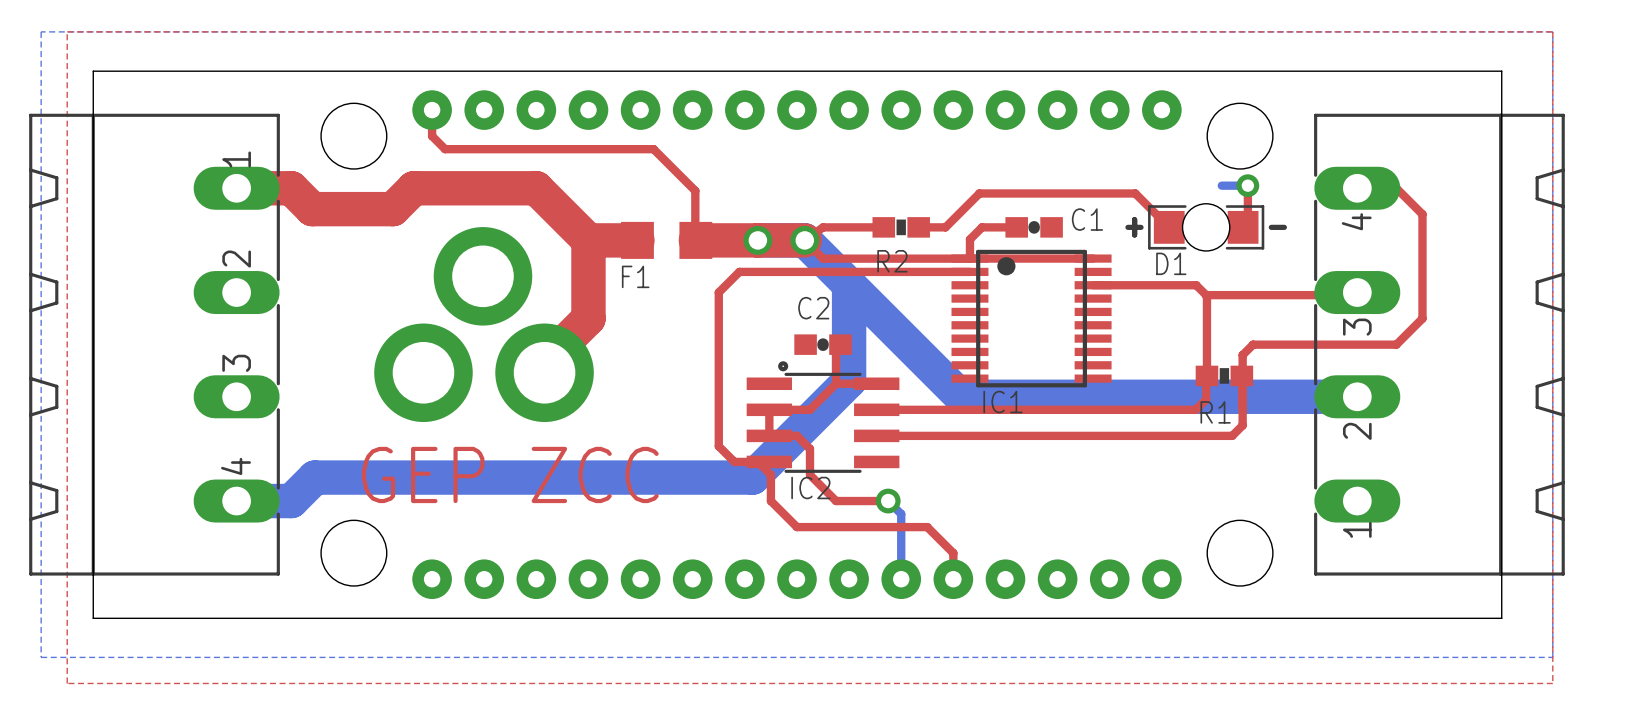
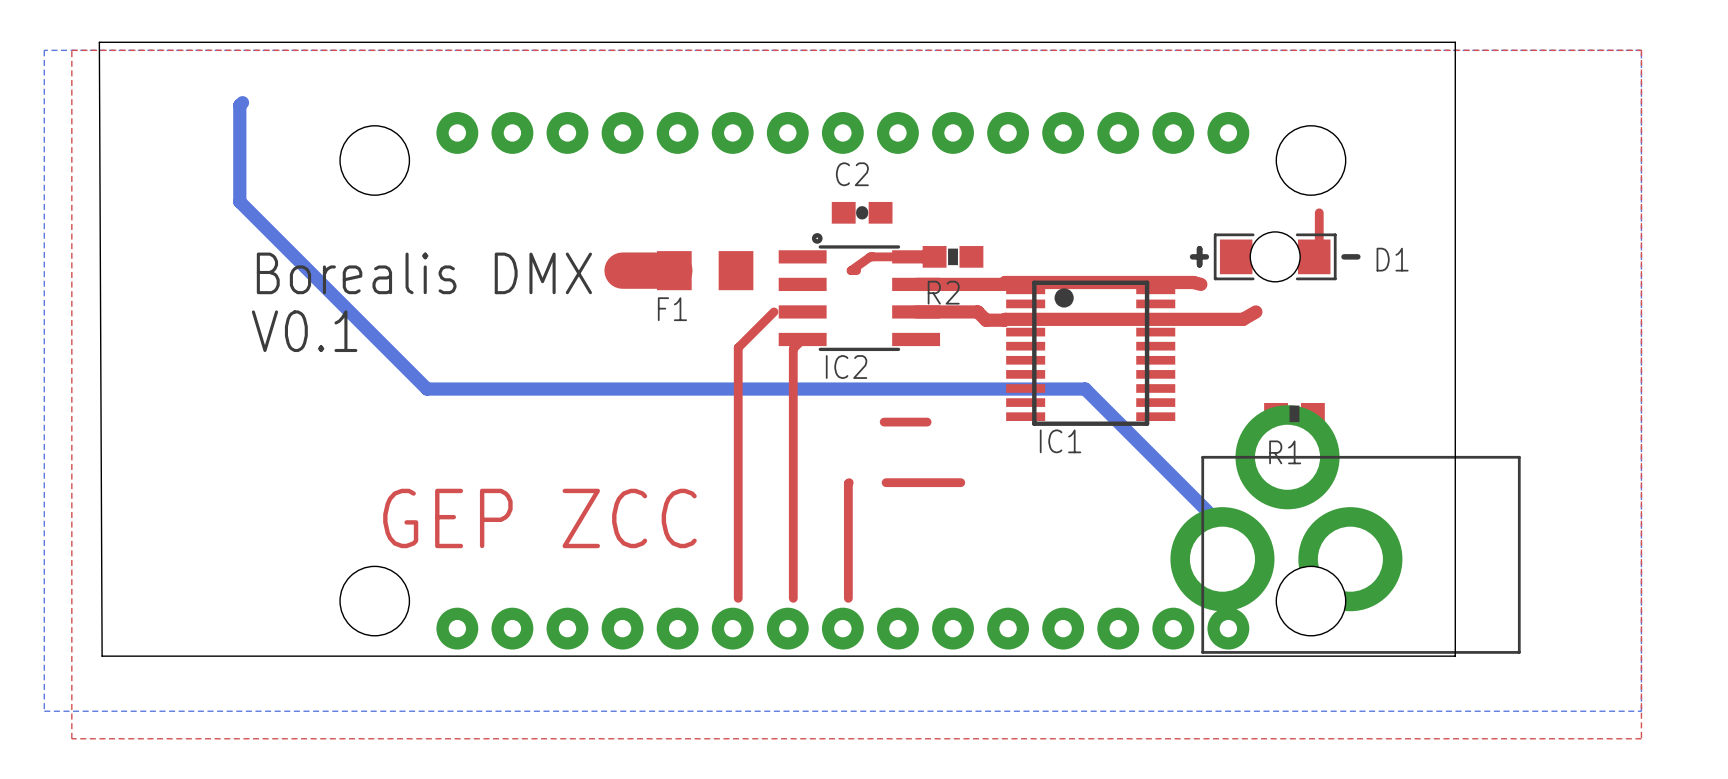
board edge: (93, 71) (1501, 71) (1501, 618) (93, 618) (93, 71) -> (99, 42) (102, 656) (1455, 656) (1455, 42) (99, 42)
bottom track: none -> (242, 102) (239, 105) (239, 201) (427, 389) (1085, 389) (1222, 526) (1222, 559)
top track: (432, 110) (432, 136) (445, 149) (653, 149) (695, 190) (695, 240) (804, 240) (823, 258) (969, 257) -> none
bottom track: (1221, 185) (1247, 185) -> none
via: (1247, 185) -> none
top track: (236, 188) (291, 188) (312, 209) (393, 209) (413, 188) (536, 188) (588, 240) (588, 318) (544, 362) (544, 372) -> none
top track: (1357, 188) (1396, 188) (1422, 214) (1422, 318) (1396, 344) (1253, 344) (1242, 355) (1242, 425) (1232, 435) (876, 435) -> none
top track: (918, 227) (945, 227) (979, 193) (1135, 193) (1169, 227) -> none
top track: (1016, 227) (982, 227) (969, 239) (969, 258) (1093, 258) -> none
C1: (1034, 227) -> none
bottom track: (757, 240) (804, 240) (961, 396) (1357, 396) -> none
via: (757, 240) -> none
via: (804, 240) -> none
text: none -> Borealis DMX (424, 273)
top track: none -> (916, 284) (1003, 284) (1005, 282) (1193, 282) (1200, 284)
D1 name position: D1 (1171, 263) -> D1 (1392, 259)
top track: (969, 271) (739, 271) (731, 279) -> none
top track: none -> (916, 311) (977, 311) (986, 320) (1242, 319) (1255, 311)
bottom track: (849, 284) (849, 381) (752, 477) (314, 477) (291, 501) (236, 501) -> none
top track: (1093, 285) (1196, 285) (1206, 295) (1206, 399) (1195, 409) (876, 409) -> none
top track: (718, 292) (718, 446) (734, 461) (769, 461) -> (760, 325) (738, 347) (738, 598)
top track: (1357, 292) (1354, 295) (1206, 295) -> none
text: none -> V0.1 (304, 331)
top track: none -> (802, 339) (793, 348) (793, 598)
part: (484, 324) -> none
part: (154, 344) -> none
C2 position: (823, 344) -> (862, 212)
top track: (840, 344) (836, 349) (836, 383) (810, 409) (769, 409) (769, 435) (796, 435) (810, 448) (810, 474) (836, 501) (888, 501) -> none
part: (1439, 344) -> none
IC2 position: (823, 417) -> (859, 292)
top track: none -> (849, 482) (848, 598)
top track: none -> (886, 482) (960, 482)
top track: (757, 461) (770, 474) (770, 501) (796, 527) (927, 527) (953, 553) (953, 579) -> none
part: none -> (1345, 529)
bottom track: (888, 501) (901, 514) (901, 579) -> none
via: (888, 501) -> none

